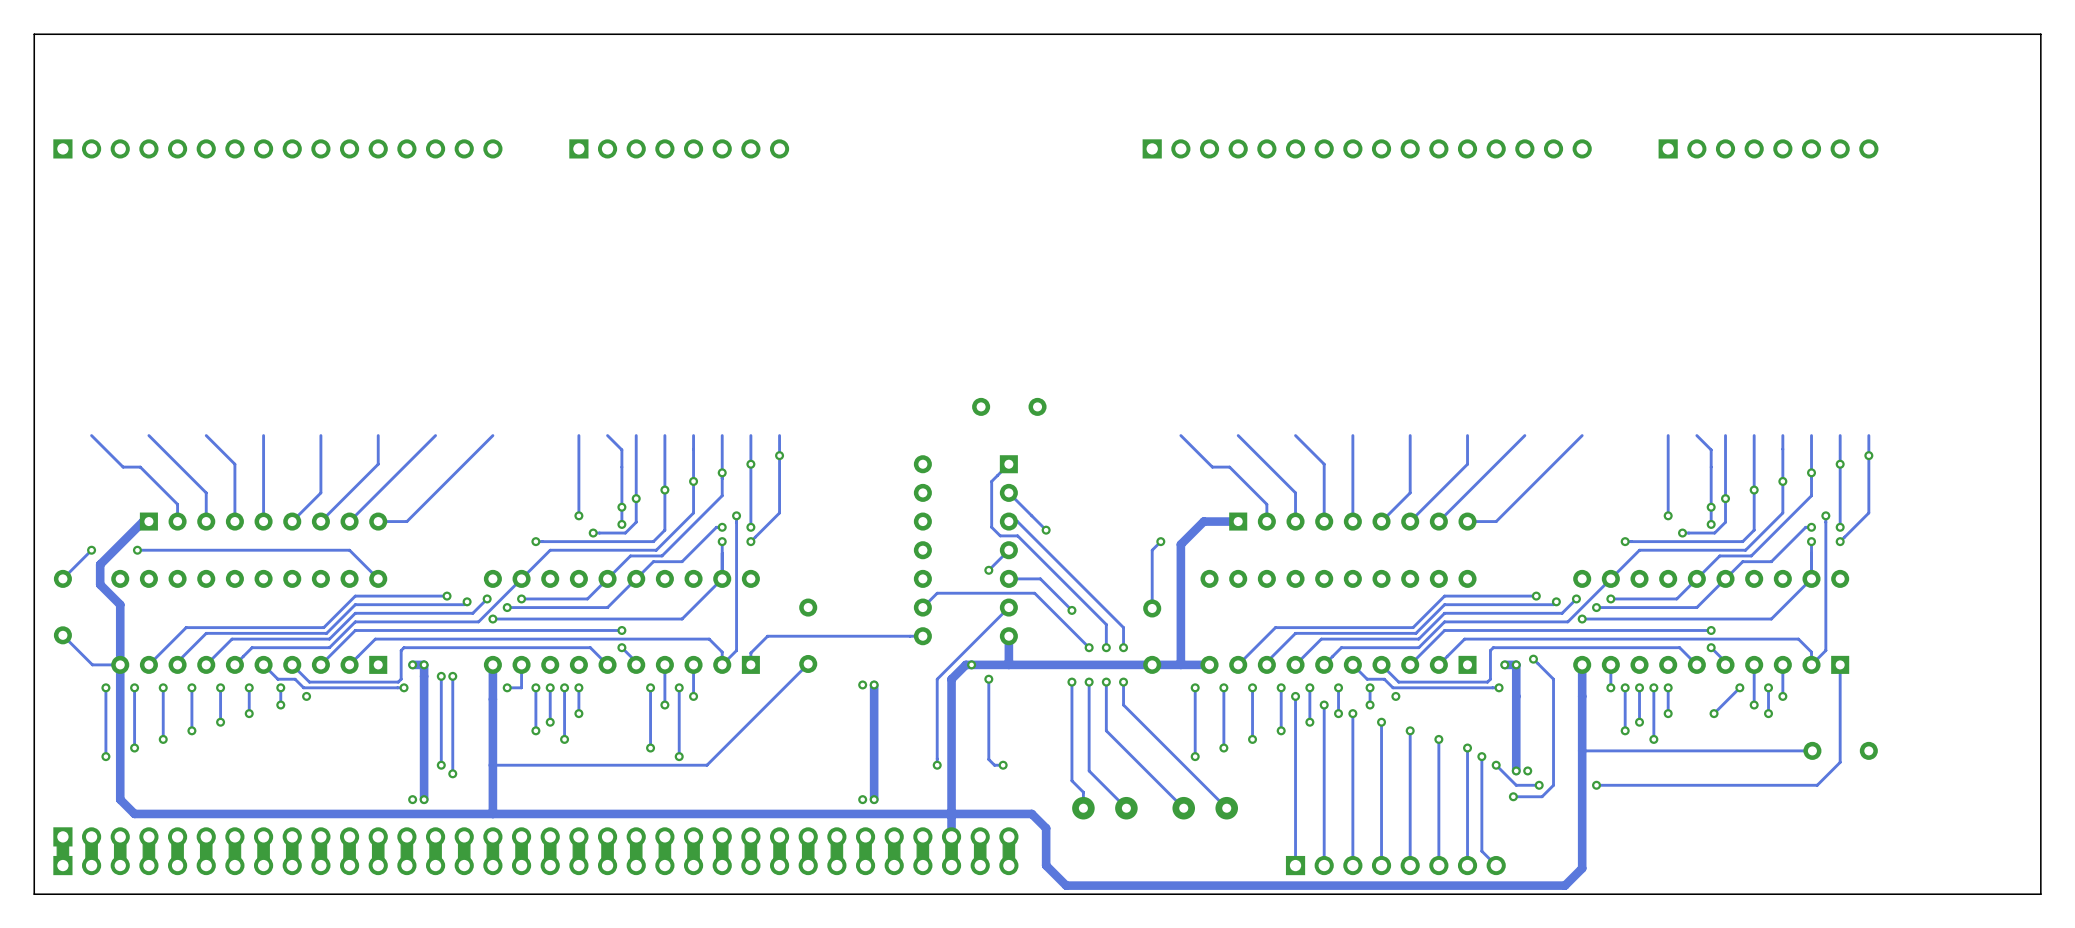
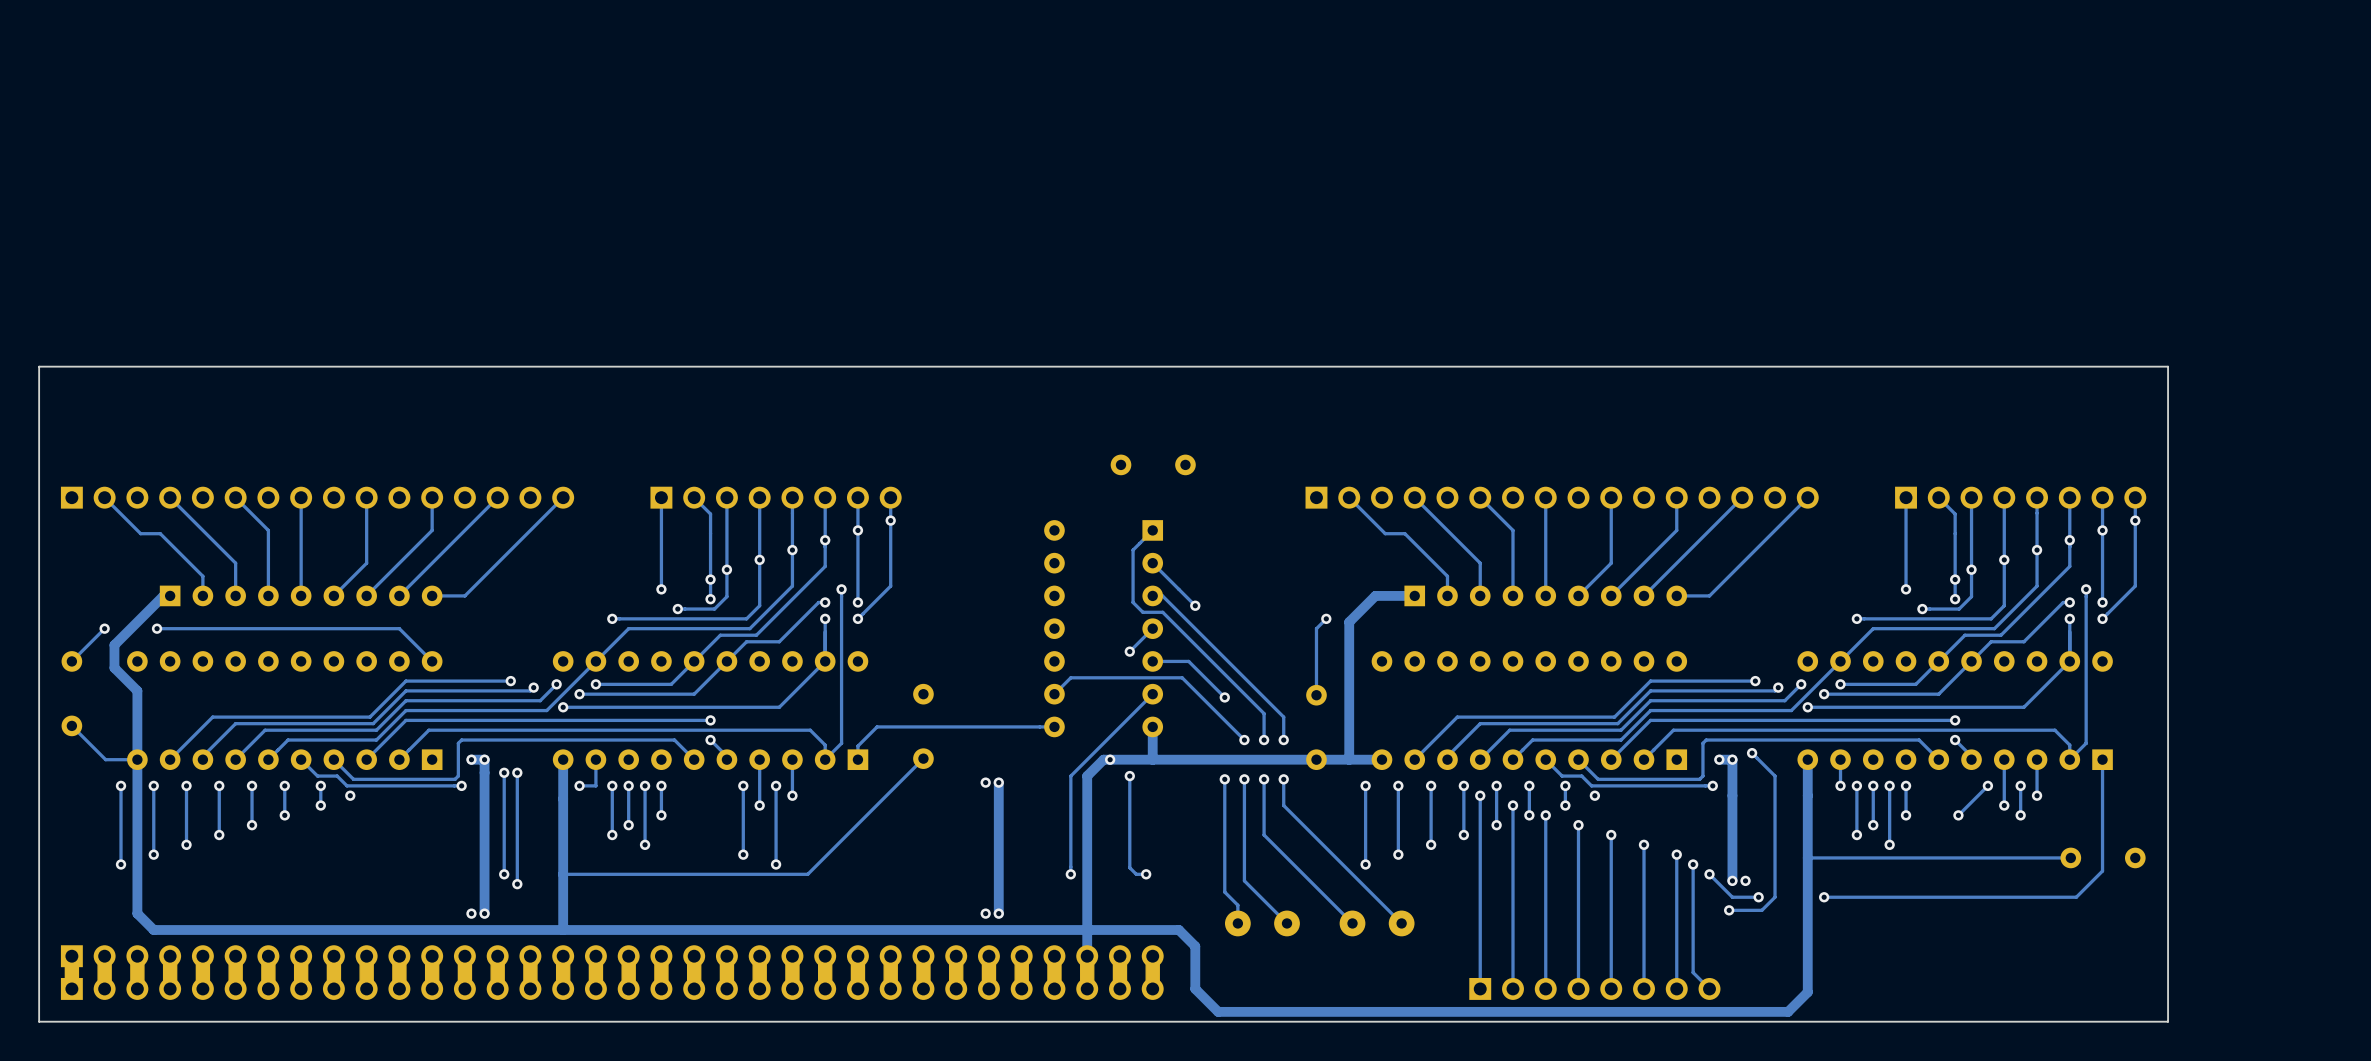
part: (277, 148) -> none
part: (679, 148) -> none
part: (1367, 148) -> none
part: (1768, 148) -> none
board edge: (34, 320) (34, 34) (2040, 34) (2040, 894) (1897, 894) -> (39, 366) (2168, 366) (2168, 1021)
part: none -> (317, 497)
part: none -> (776, 497)
part: none -> (1562, 497)
part: none -> (2020, 497)

